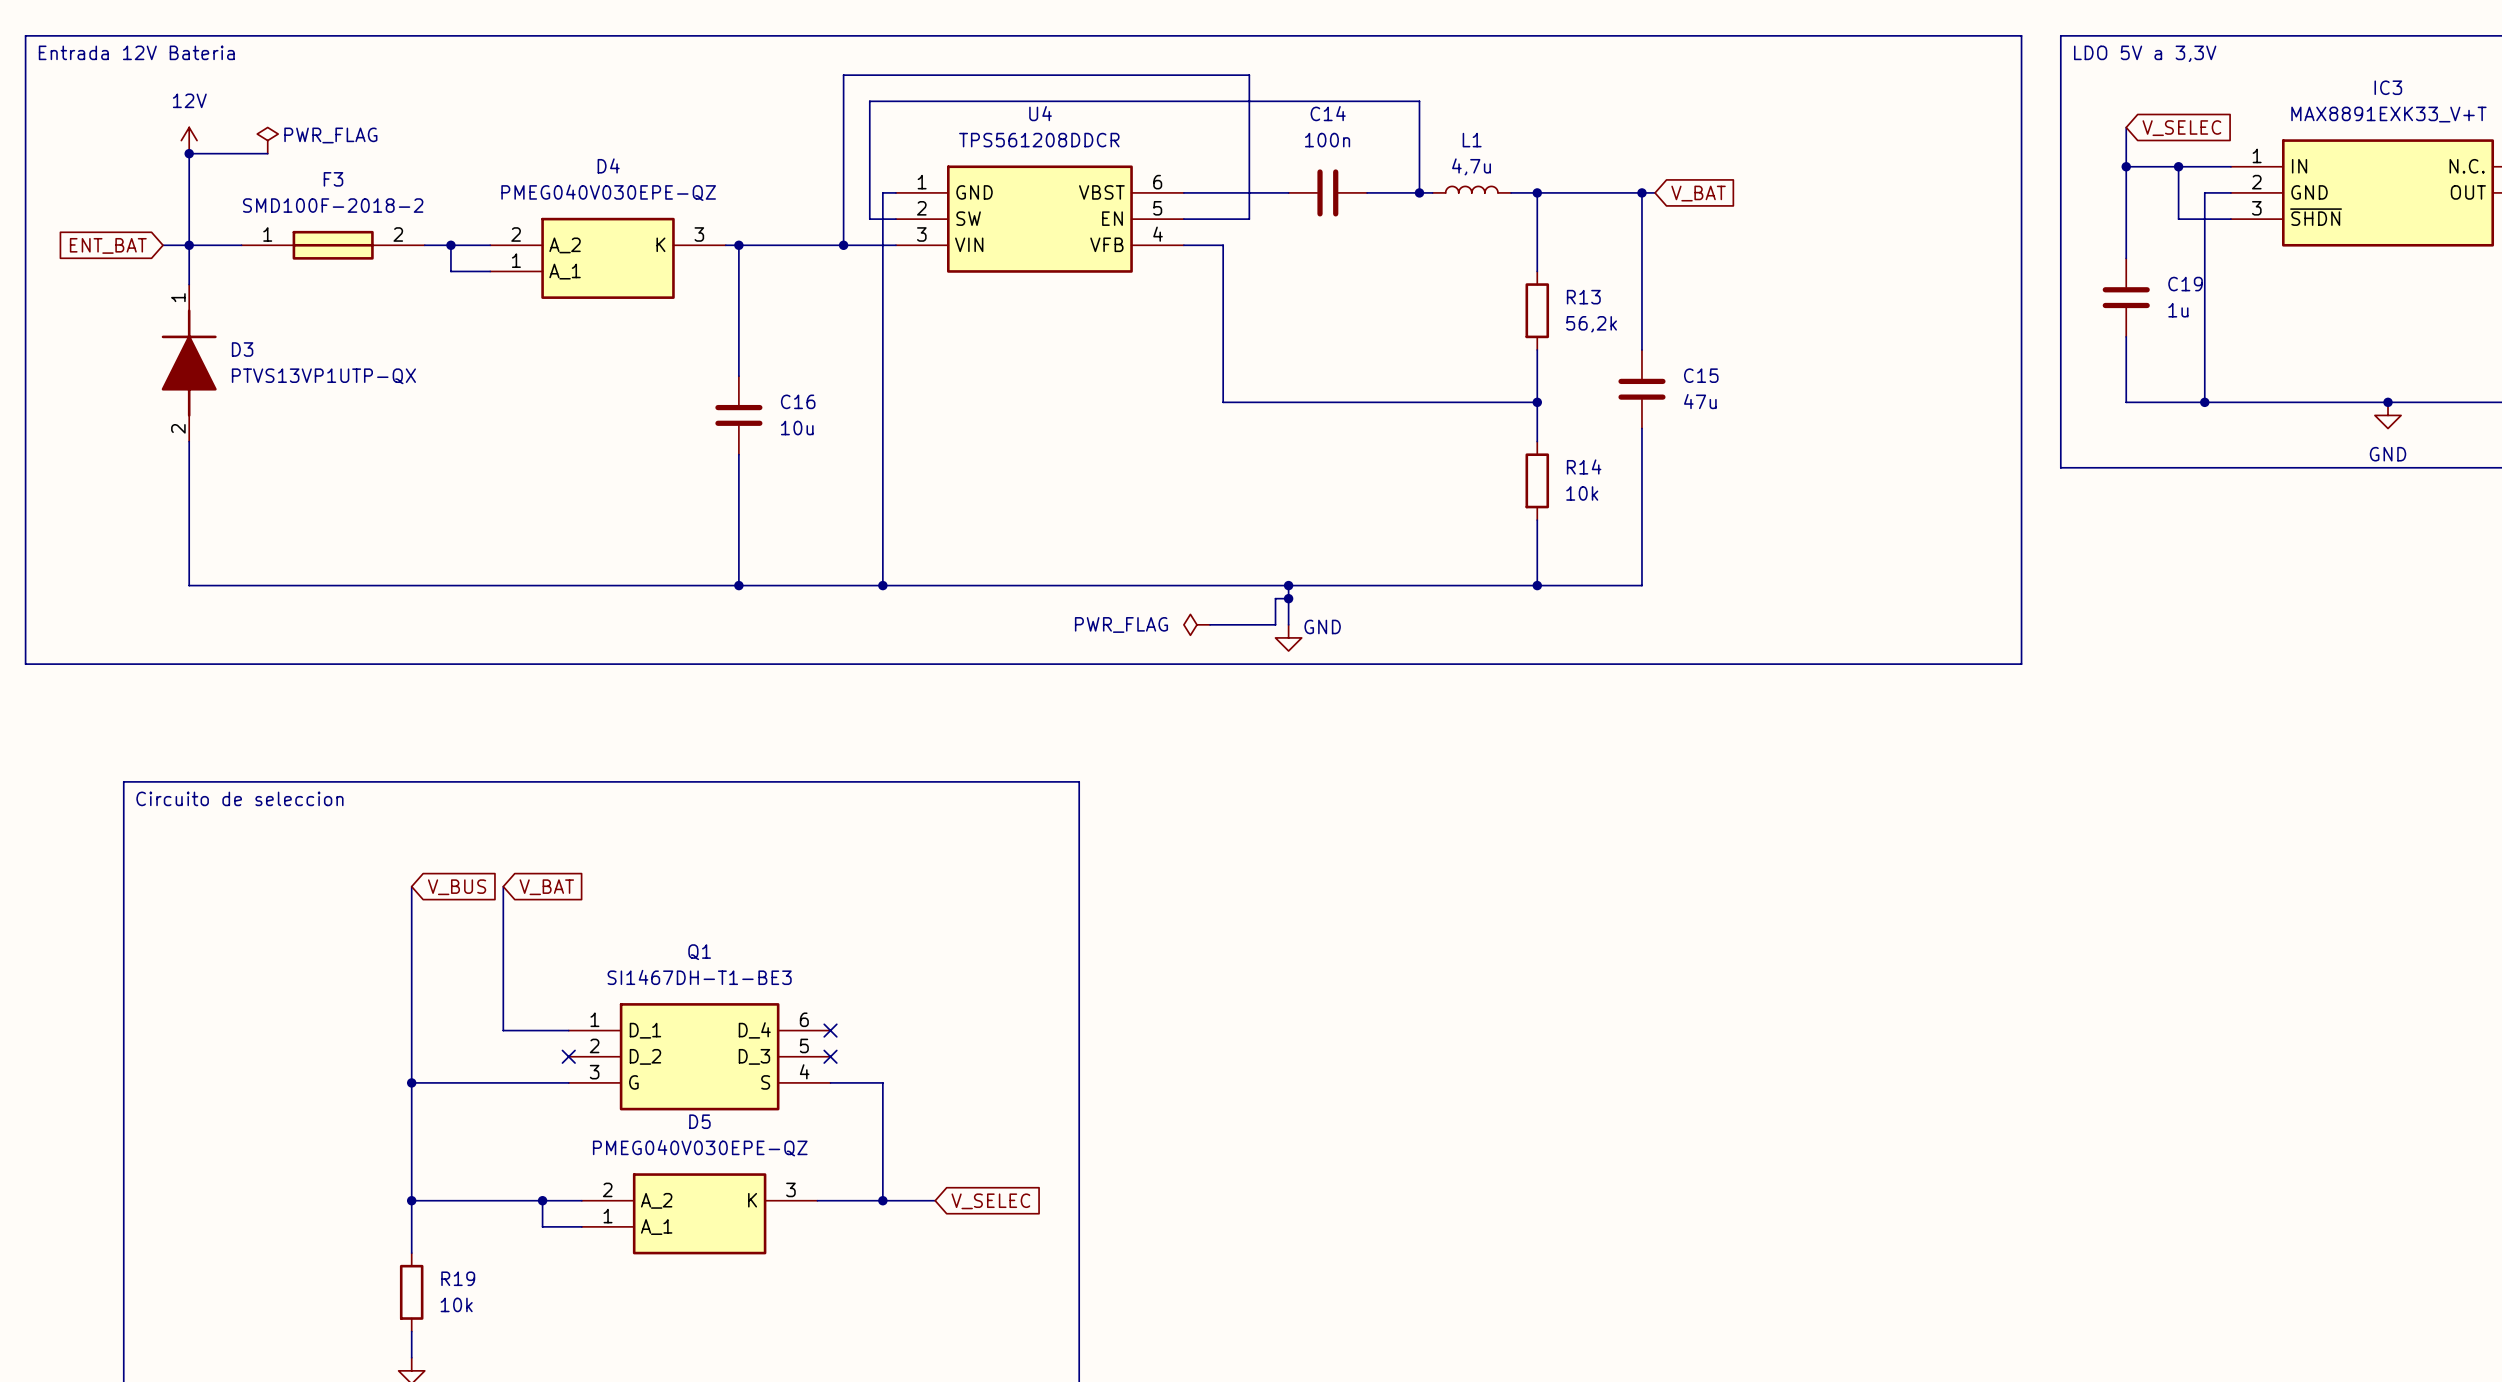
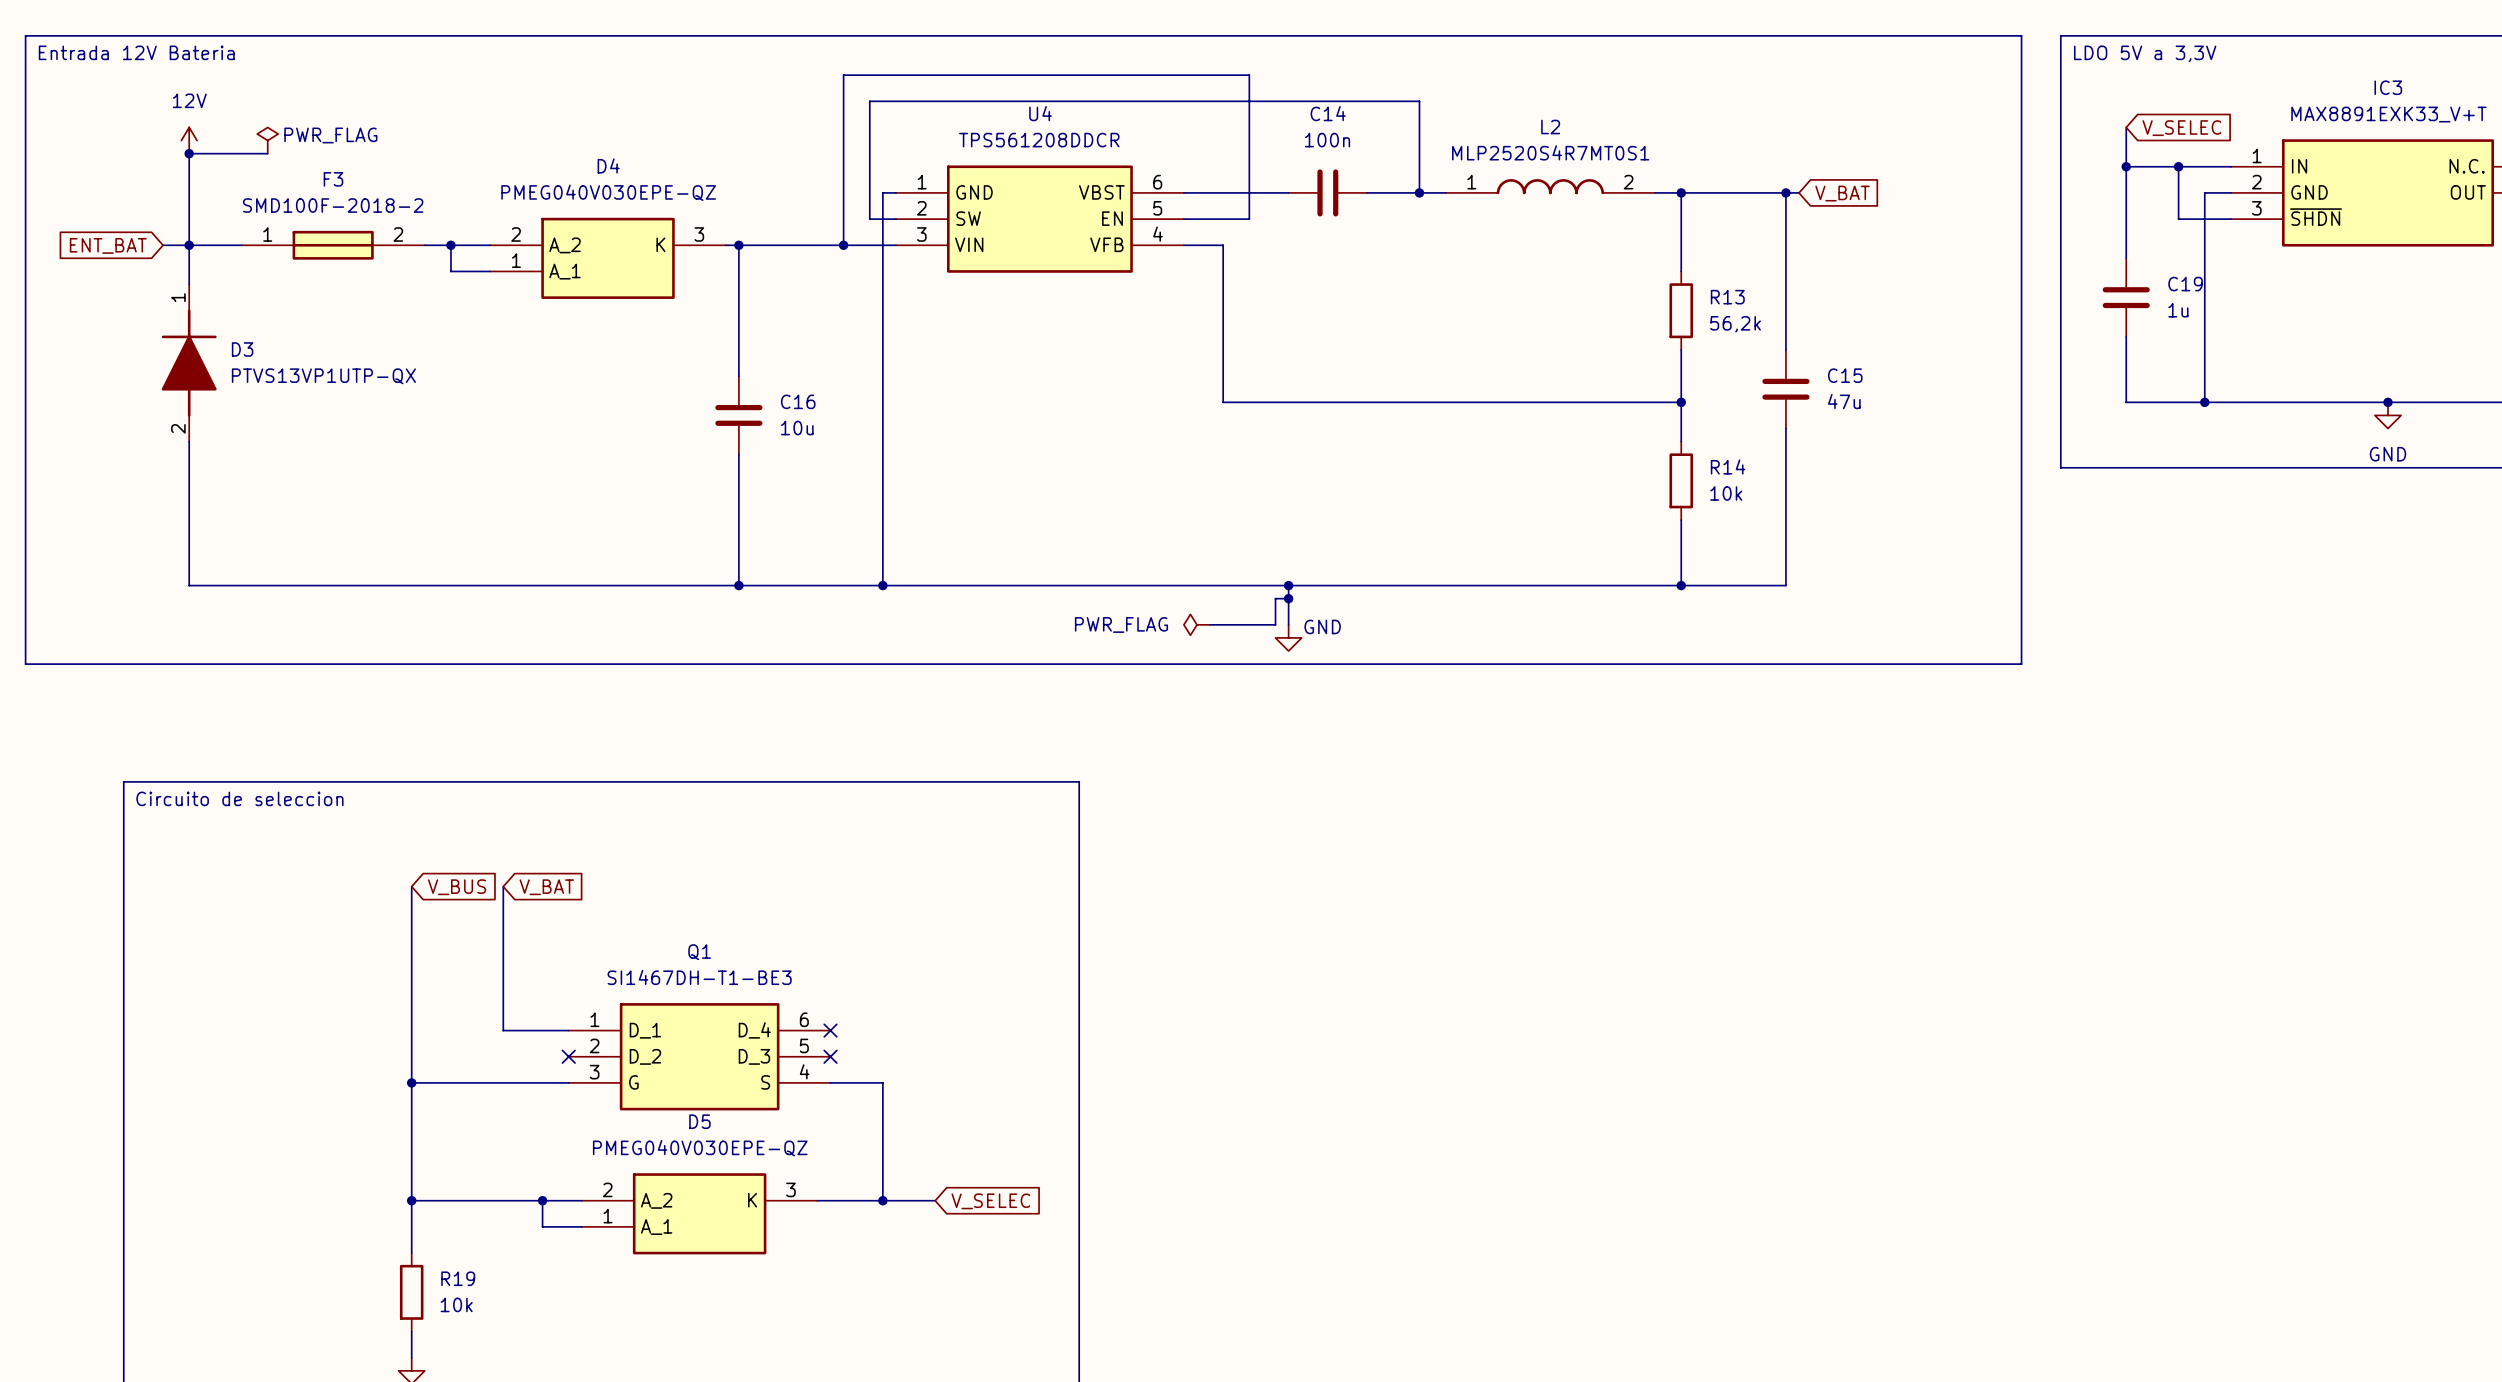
L2: none -> MLP2520S4R7MT0S1 (1550, 186)
L1: 4,7u (1471, 189) -> none
wire: (1511, 192) (1655, 192) -> (1799, 192) (1655, 192)
wire: (1537, 192) (1537, 271) -> (1681, 192) (1681, 271)
junction: (1537, 192) -> none
wire: (1641, 192) (1641, 349) -> (1785, 192) (1785, 349)
junction position: (1641, 192) -> (1681, 192)
junction: none -> (1785, 192)
global label position: V_BAT (1698, 193) -> V_BAT (1842, 193)
R13 position: (1537, 310) -> (1681, 310)
wire: (1537, 349) (1537, 441) -> (1681, 349) (1681, 441)
C15 position: (1641, 389) -> (1785, 389)
wire: none -> (1537, 402) (1681, 402)
junction: (1537, 402) -> none
junction: none -> (1681, 402)
wire: (1641, 428) (1641, 585) -> (1785, 428) (1785, 585) (1641, 585)
R14 position: (1537, 480) -> (1681, 480)
wire: (1537, 520) (1537, 585) -> (1681, 520) (1681, 585)
junction: (1537, 585) -> none
junction: none -> (1681, 585)

